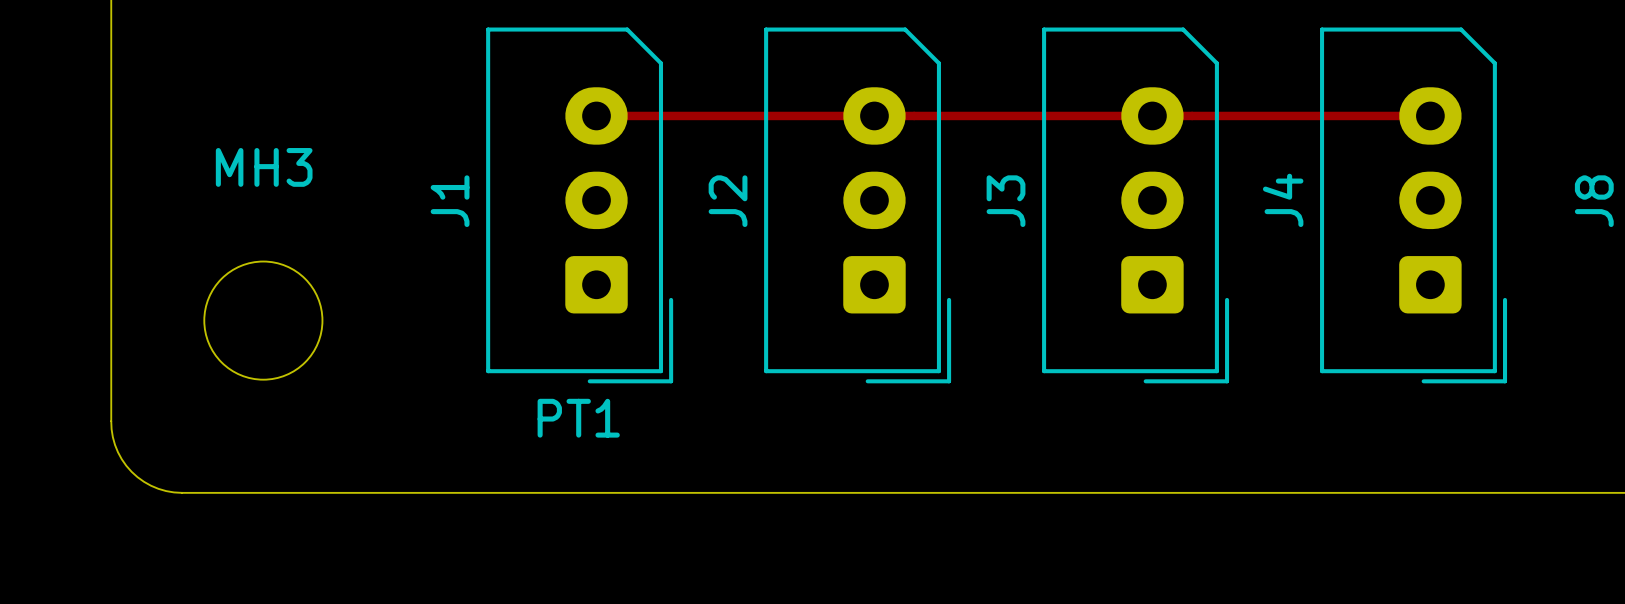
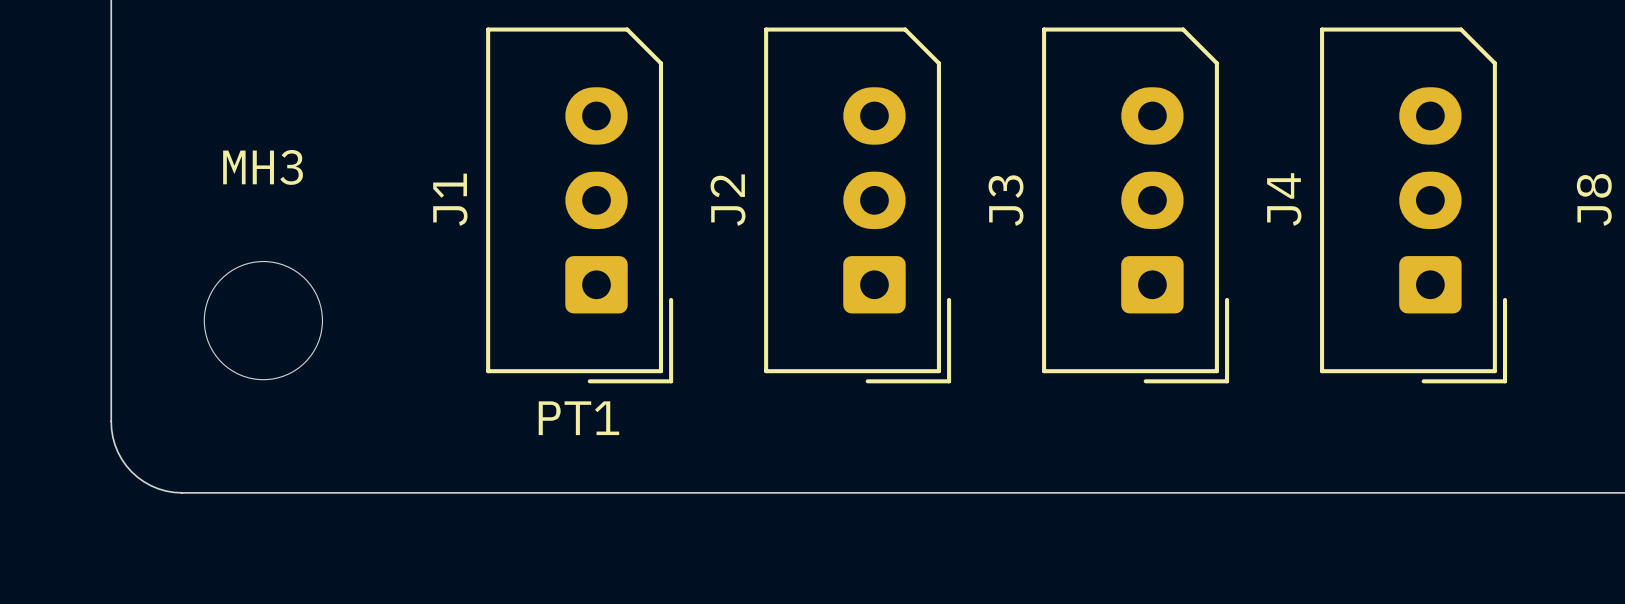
track: (596, 115) (1430, 115) -> none

